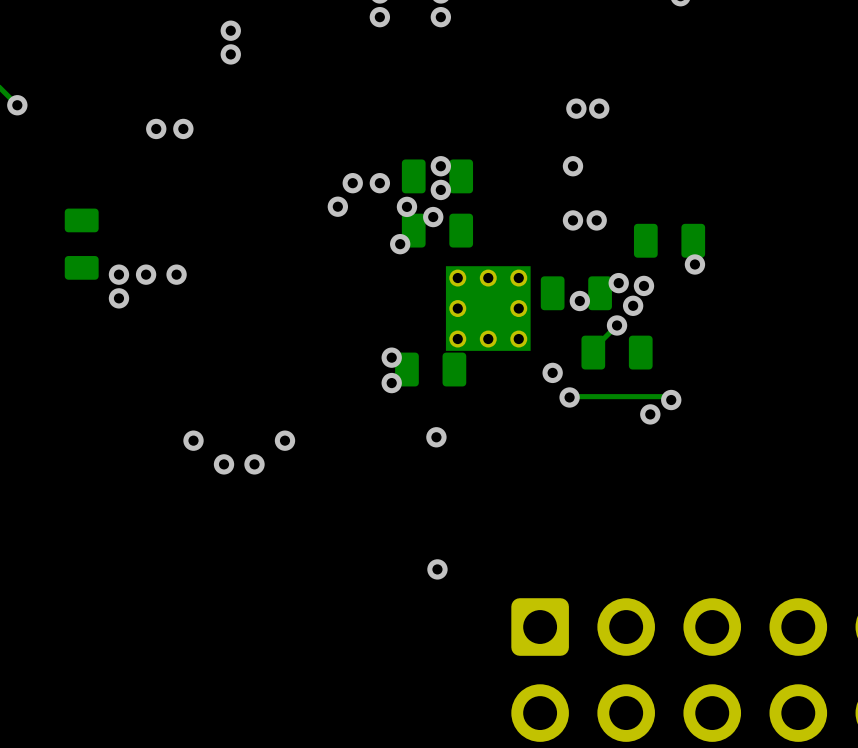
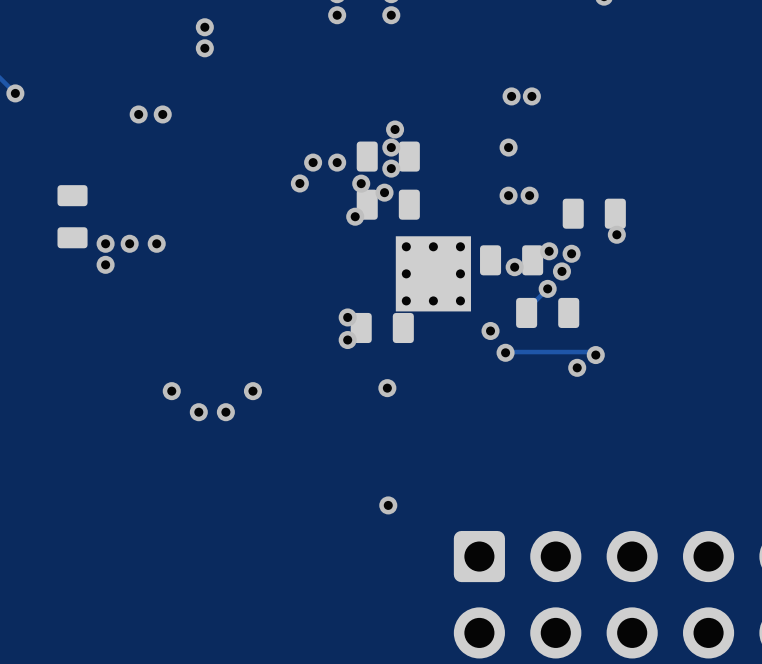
via: none -> (395, 129)

